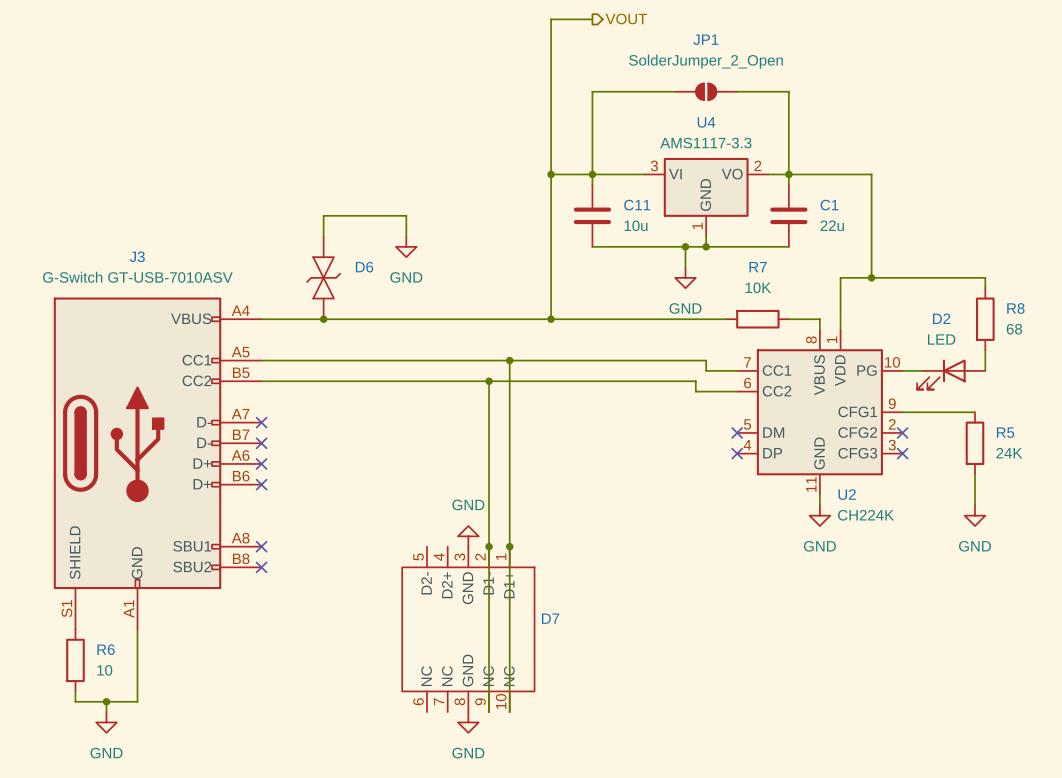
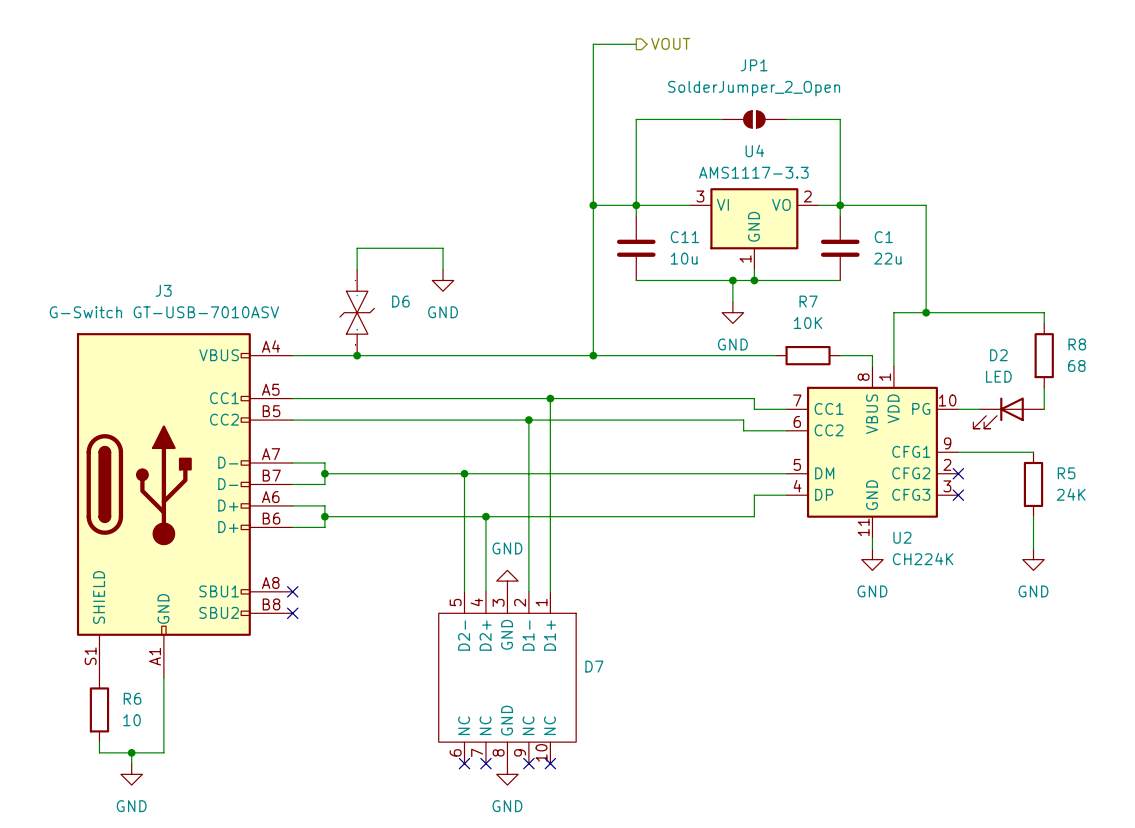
wire: none -> (292, 463) (324, 463) (324, 484) (292, 484)
no-connect mark: (261, 422) -> none
wire: none -> (324, 473) (786, 473)
junction: none -> (324, 473)
wire: none -> (464, 473) (464, 591)
junction: none -> (464, 473)
no-connect mark: (737, 432) -> none
no-connect mark: (261, 443) -> none
wire: none -> (786, 495) (754, 495) (754, 516) (324, 516)
no-connect mark: (737, 453) -> none
wire: none -> (292, 505) (324, 505) (324, 527) (292, 527)
no-connect mark: (261, 463) -> none
junction: none -> (324, 516)
wire: none -> (485, 516) (485, 591)
junction: none -> (485, 516)
no-connect mark: (261, 484) -> none
wire: (489, 546) (489, 712) -> none
junction: (489, 546) -> none
wire: (509, 546) (509, 712) -> none
junction: (509, 546) -> none
no-connect mark: none -> (464, 763)
no-connect mark: none -> (485, 763)
no-connect mark: none -> (528, 763)
no-connect mark: none -> (550, 763)

